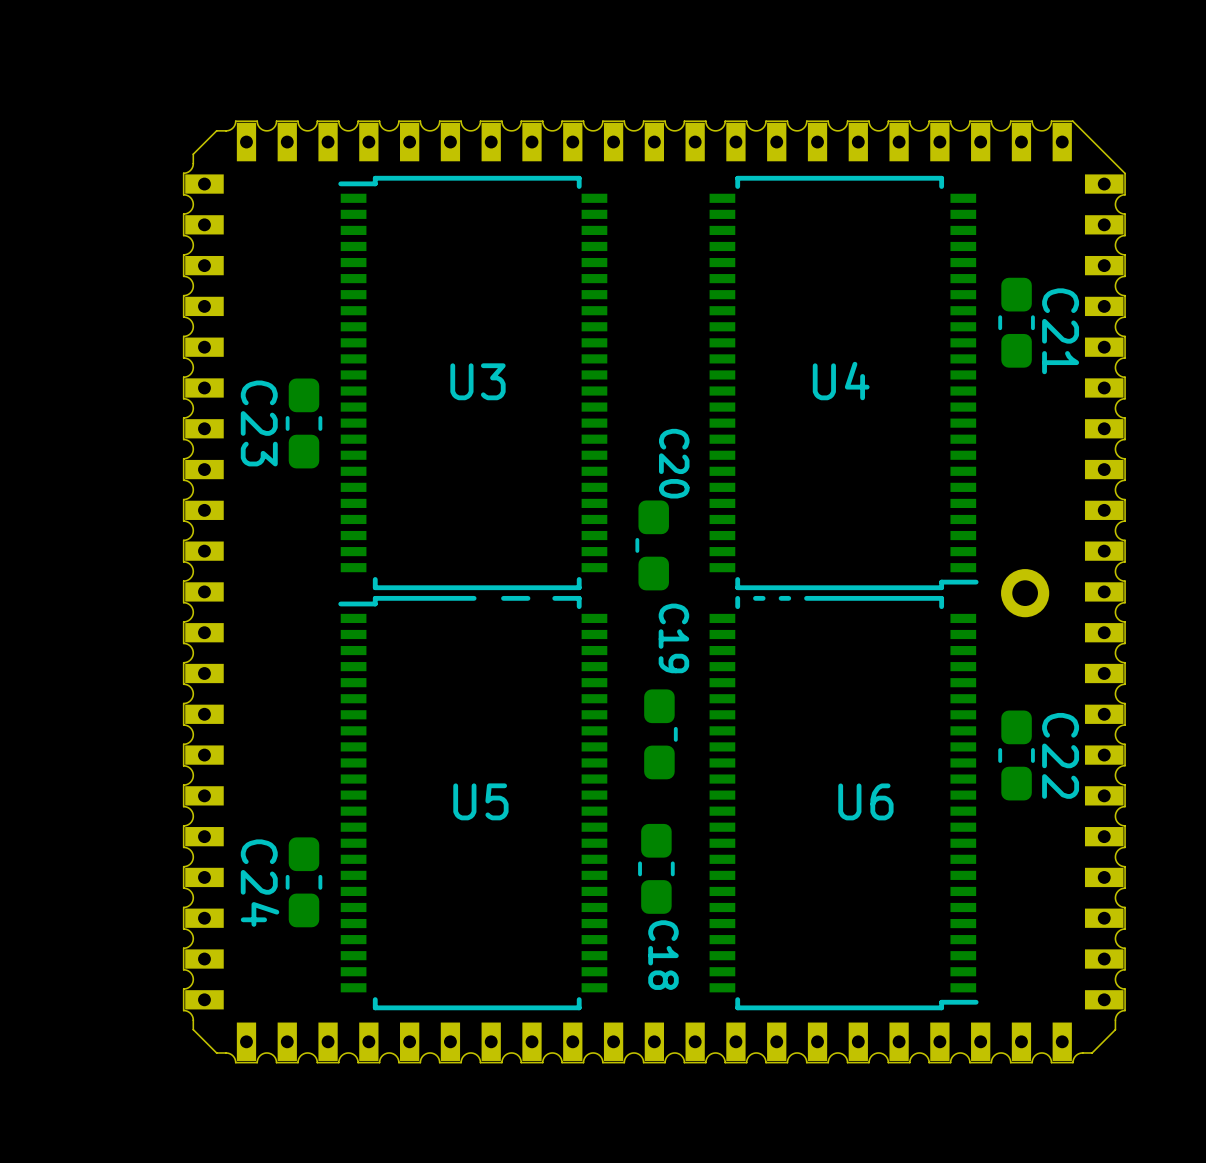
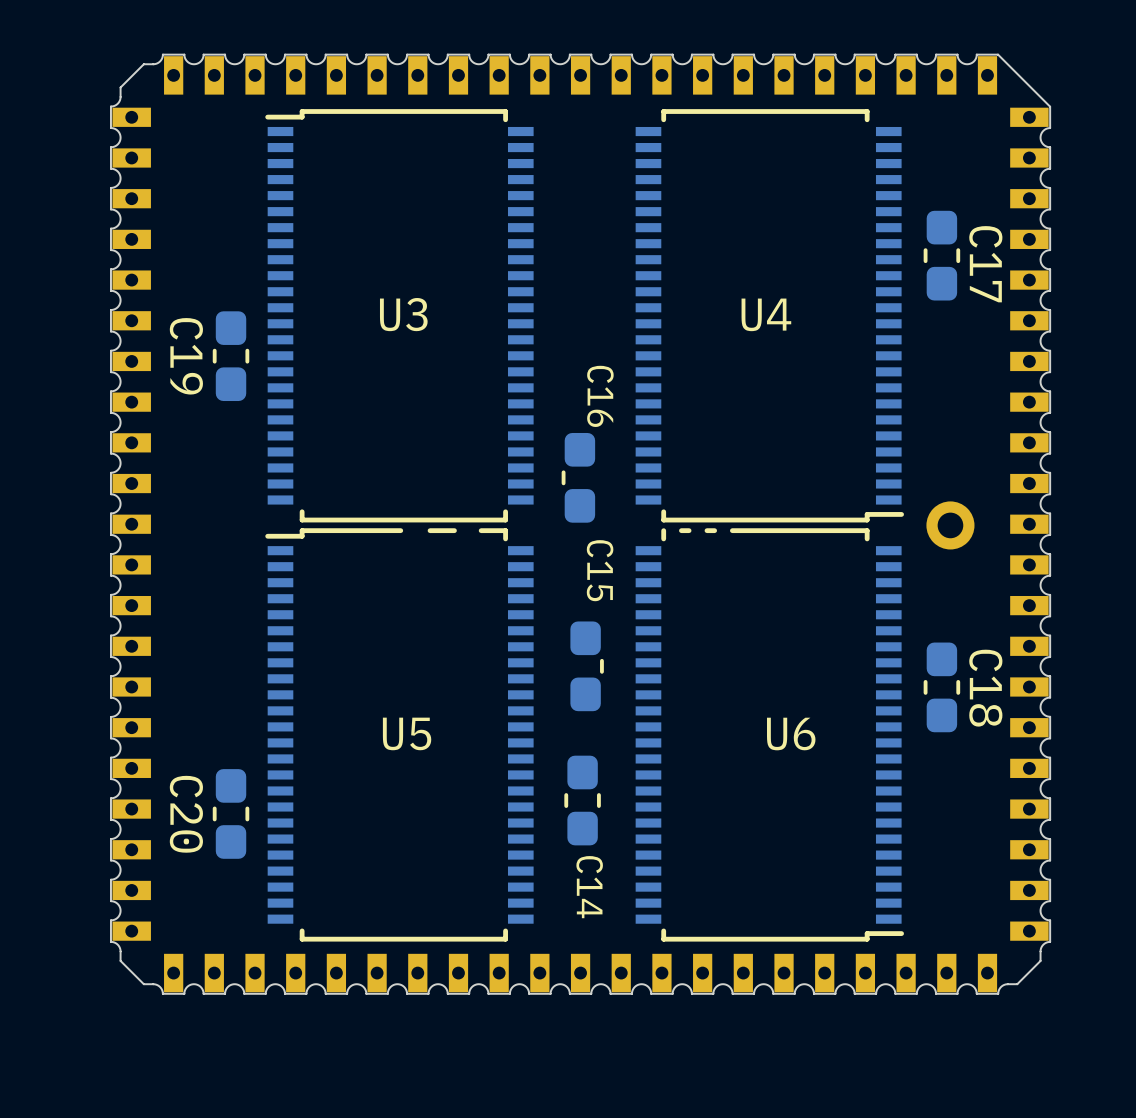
C21 name: C21 (1060, 331) -> C17 (985, 264)
C23 name: C23 (259, 423) -> C19 (186, 356)
C20 name: C20 (674, 463) -> C16 (600, 396)
C19 name: C19 (673, 638) -> C15 (600, 570)
C22 name: C22 (1060, 755) -> C18 (985, 688)
C24 name: C24 (260, 883) -> C20 (186, 814)
C18 name: C18 (663, 955) -> C14 (589, 887)

